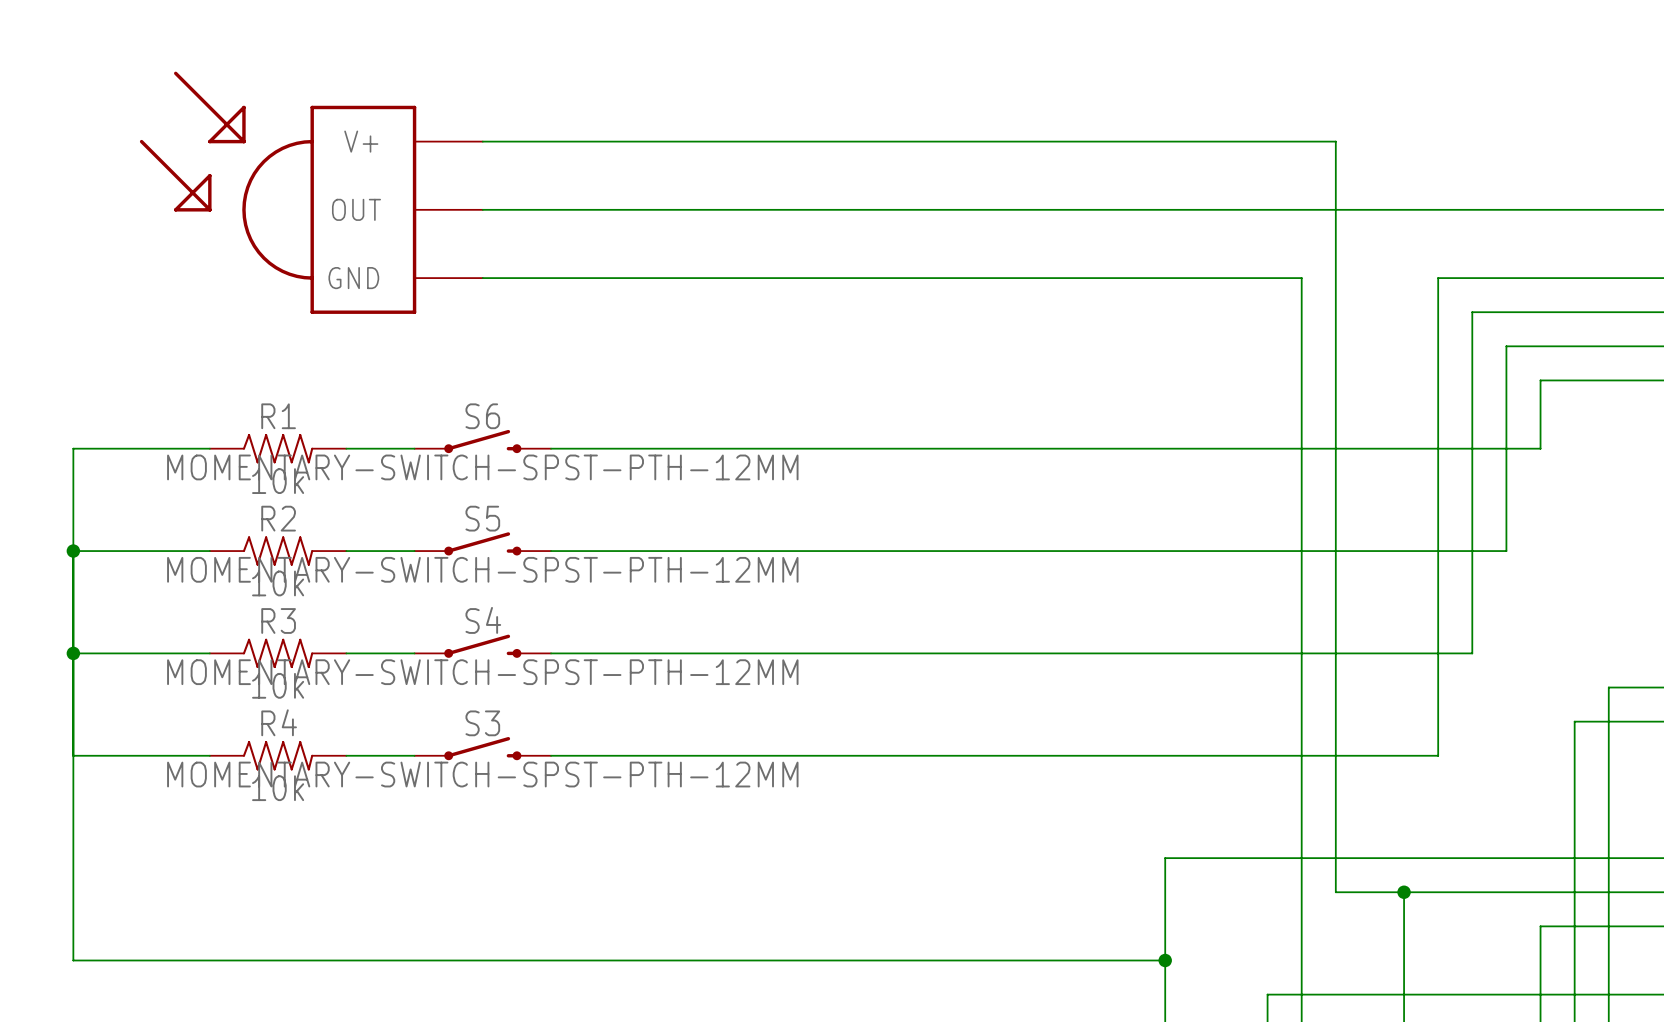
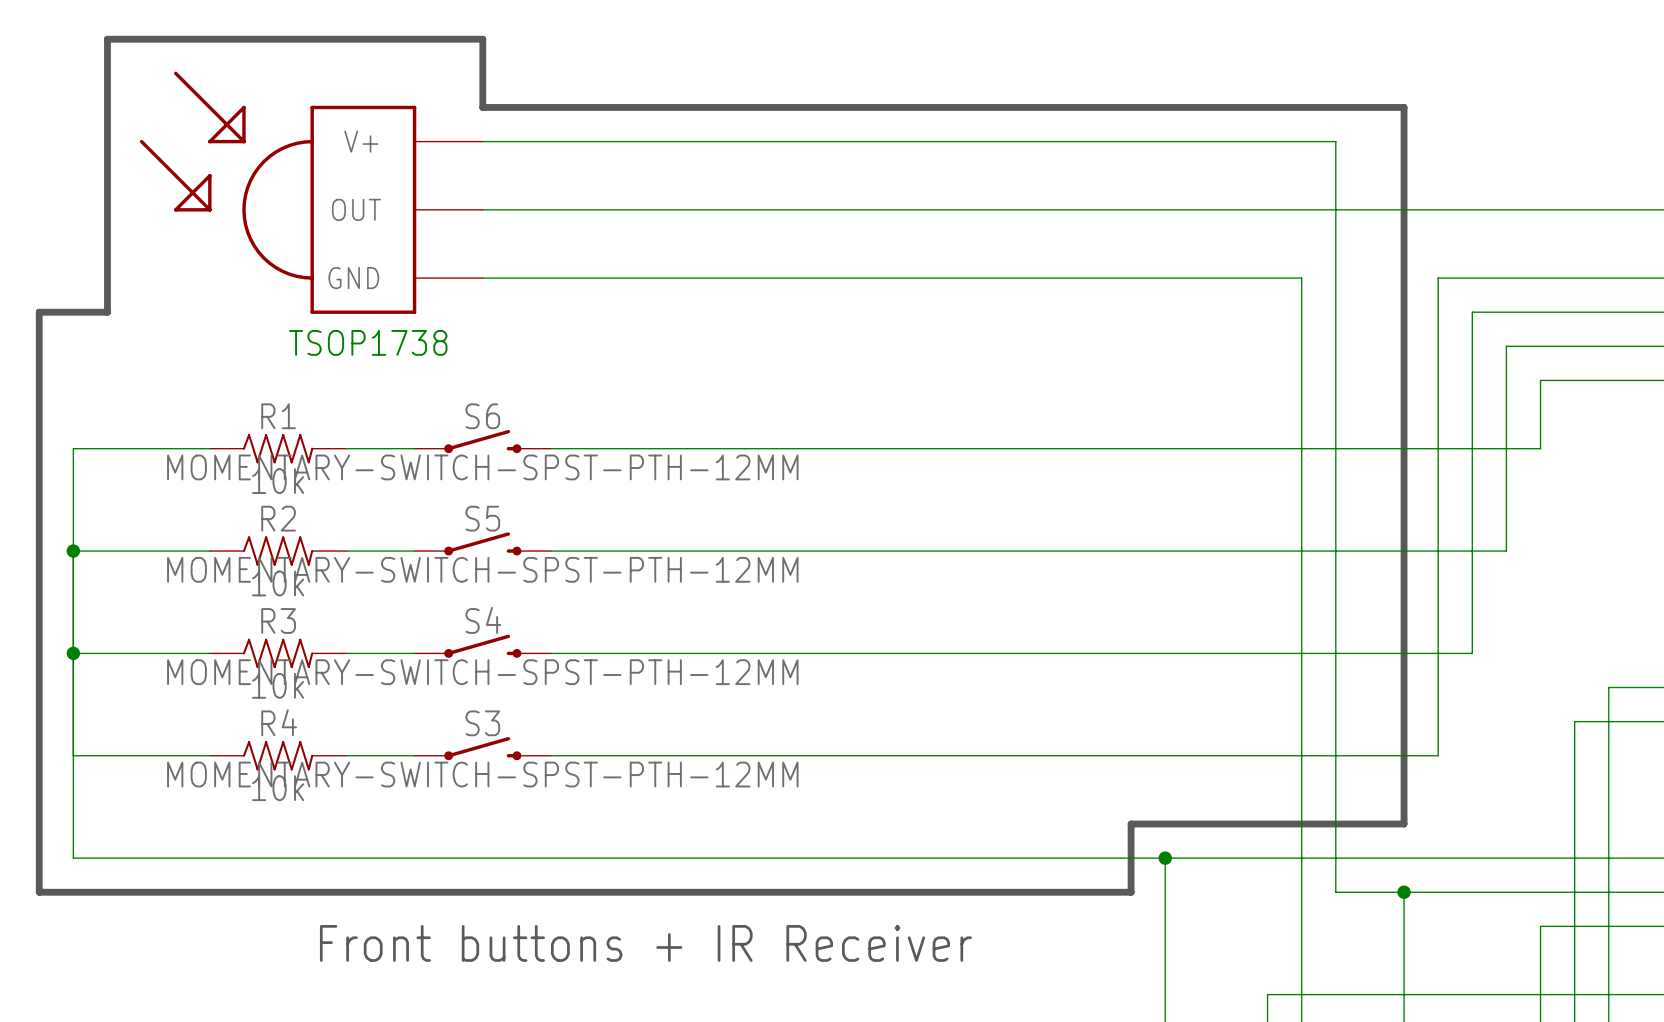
line: none -> (107, 39) (107, 312) (39, 312) (39, 892) (1131, 892) (1131, 824) (1404, 824) (1404, 107) (482, 107) (482, 39) (107, 39)
text: none -> TSOP1738 (368, 342)
wire: (73, 858) (73, 960) (1165, 960) -> (73, 858) (1165, 858)
junction: none -> (1165, 858)
text: none -> Front buttons + IR Receiver (645, 943)
junction: (1165, 960) -> none

